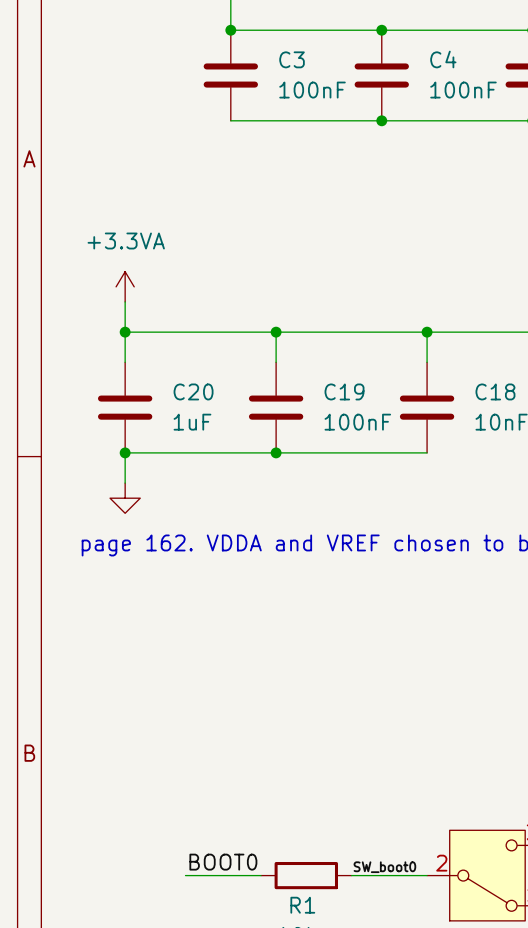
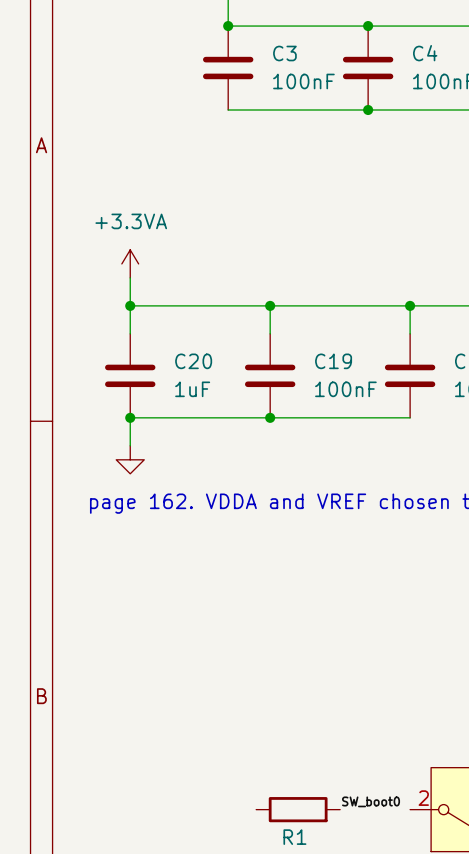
label: BOOT0 (223, 862) -> none
wire: (185, 875) (261, 875) -> none
wire: (351, 875) (427, 875) -> none

